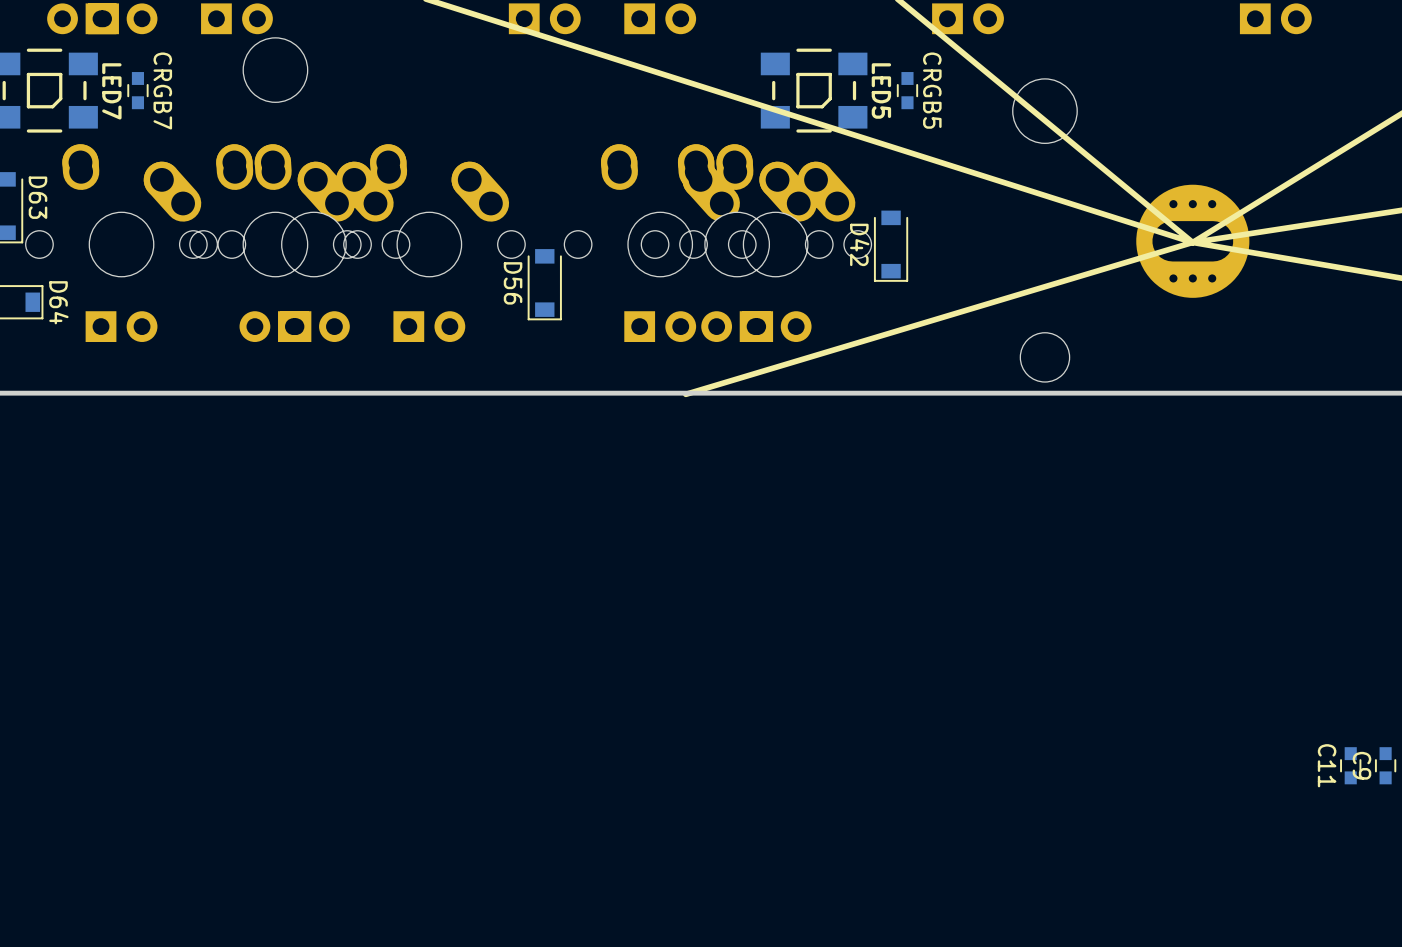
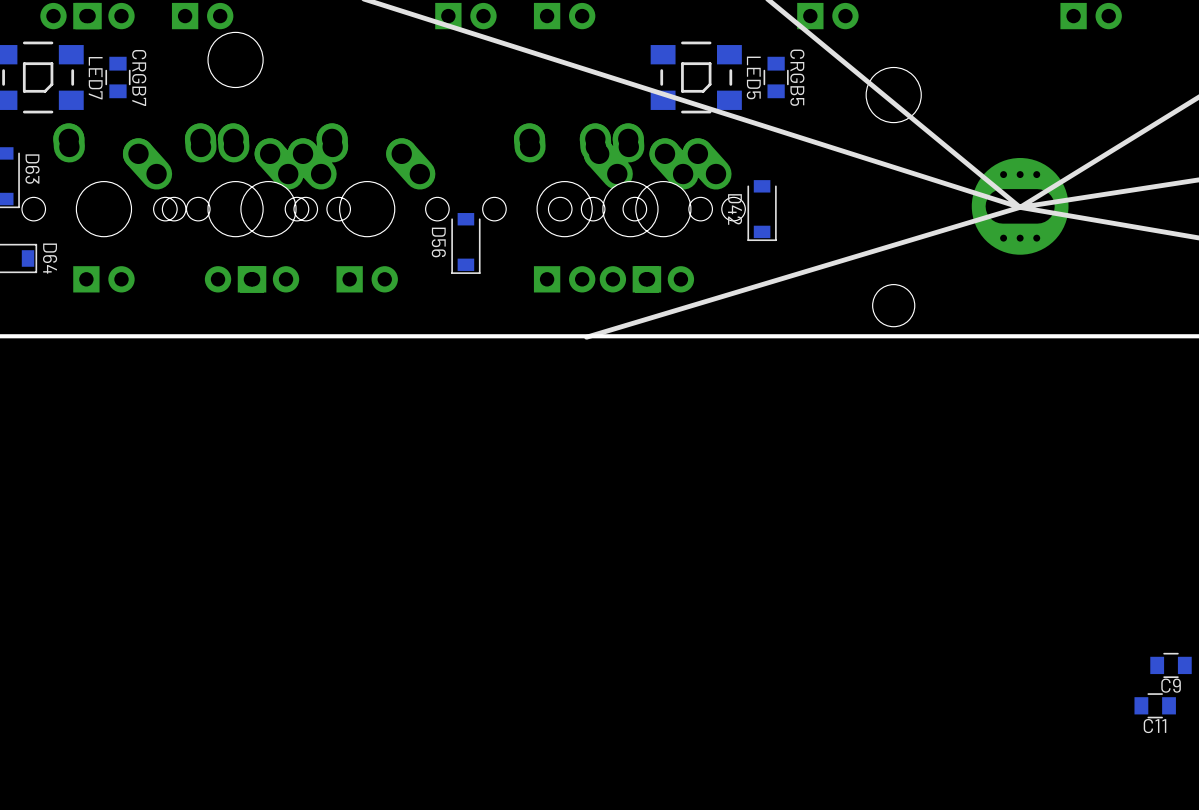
CRGB7 footprint: [127, 72, 149, 110] -> [105, 56, 131, 99]
CRGB5 footprint: [896, 72, 919, 110] -> [763, 56, 789, 99]
C11 footprint: [1340, 747, 1362, 785] -> [1134, 693, 1176, 719]
C9 footprint: [1374, 747, 1397, 785] -> [1150, 652, 1192, 679]
C11 name position: C11 (1327, 765) -> C11 (1155, 726)
C9 name position: C9 (1361, 765) -> C9 (1171, 685)

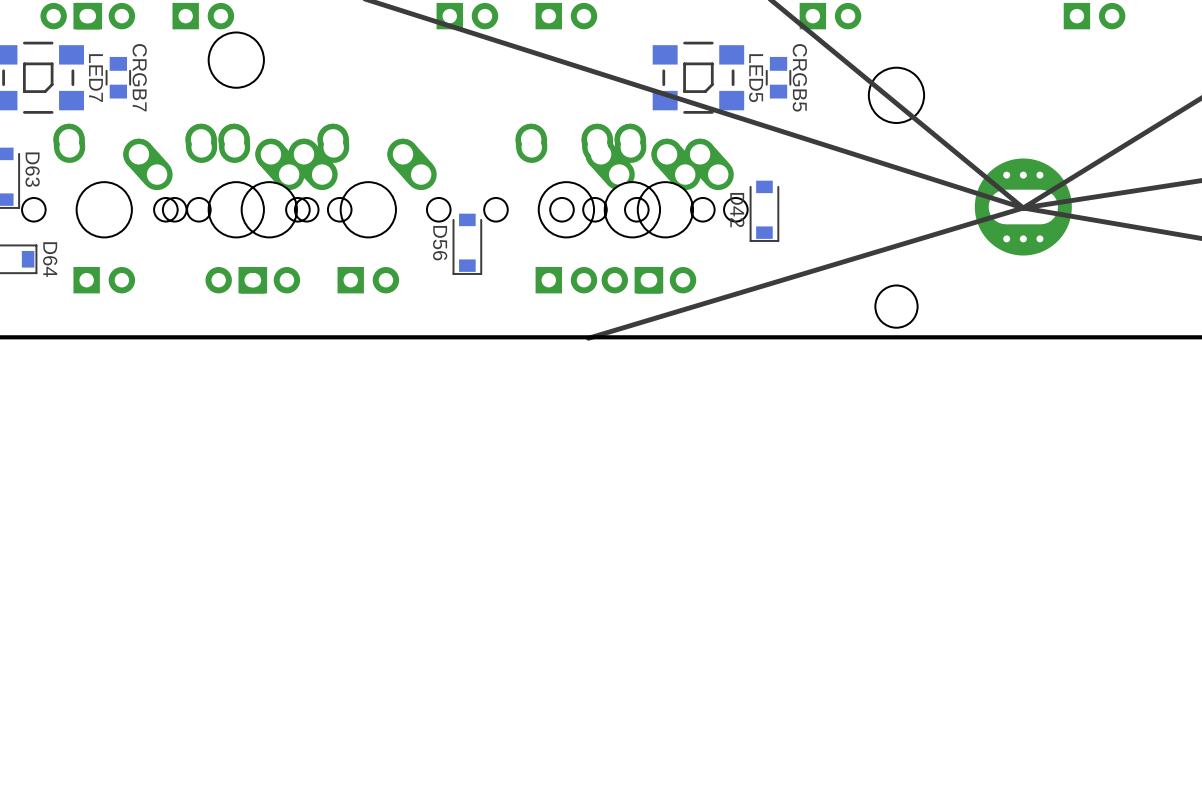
C9: (1171, 665) -> none
C11: (1155, 705) -> none

